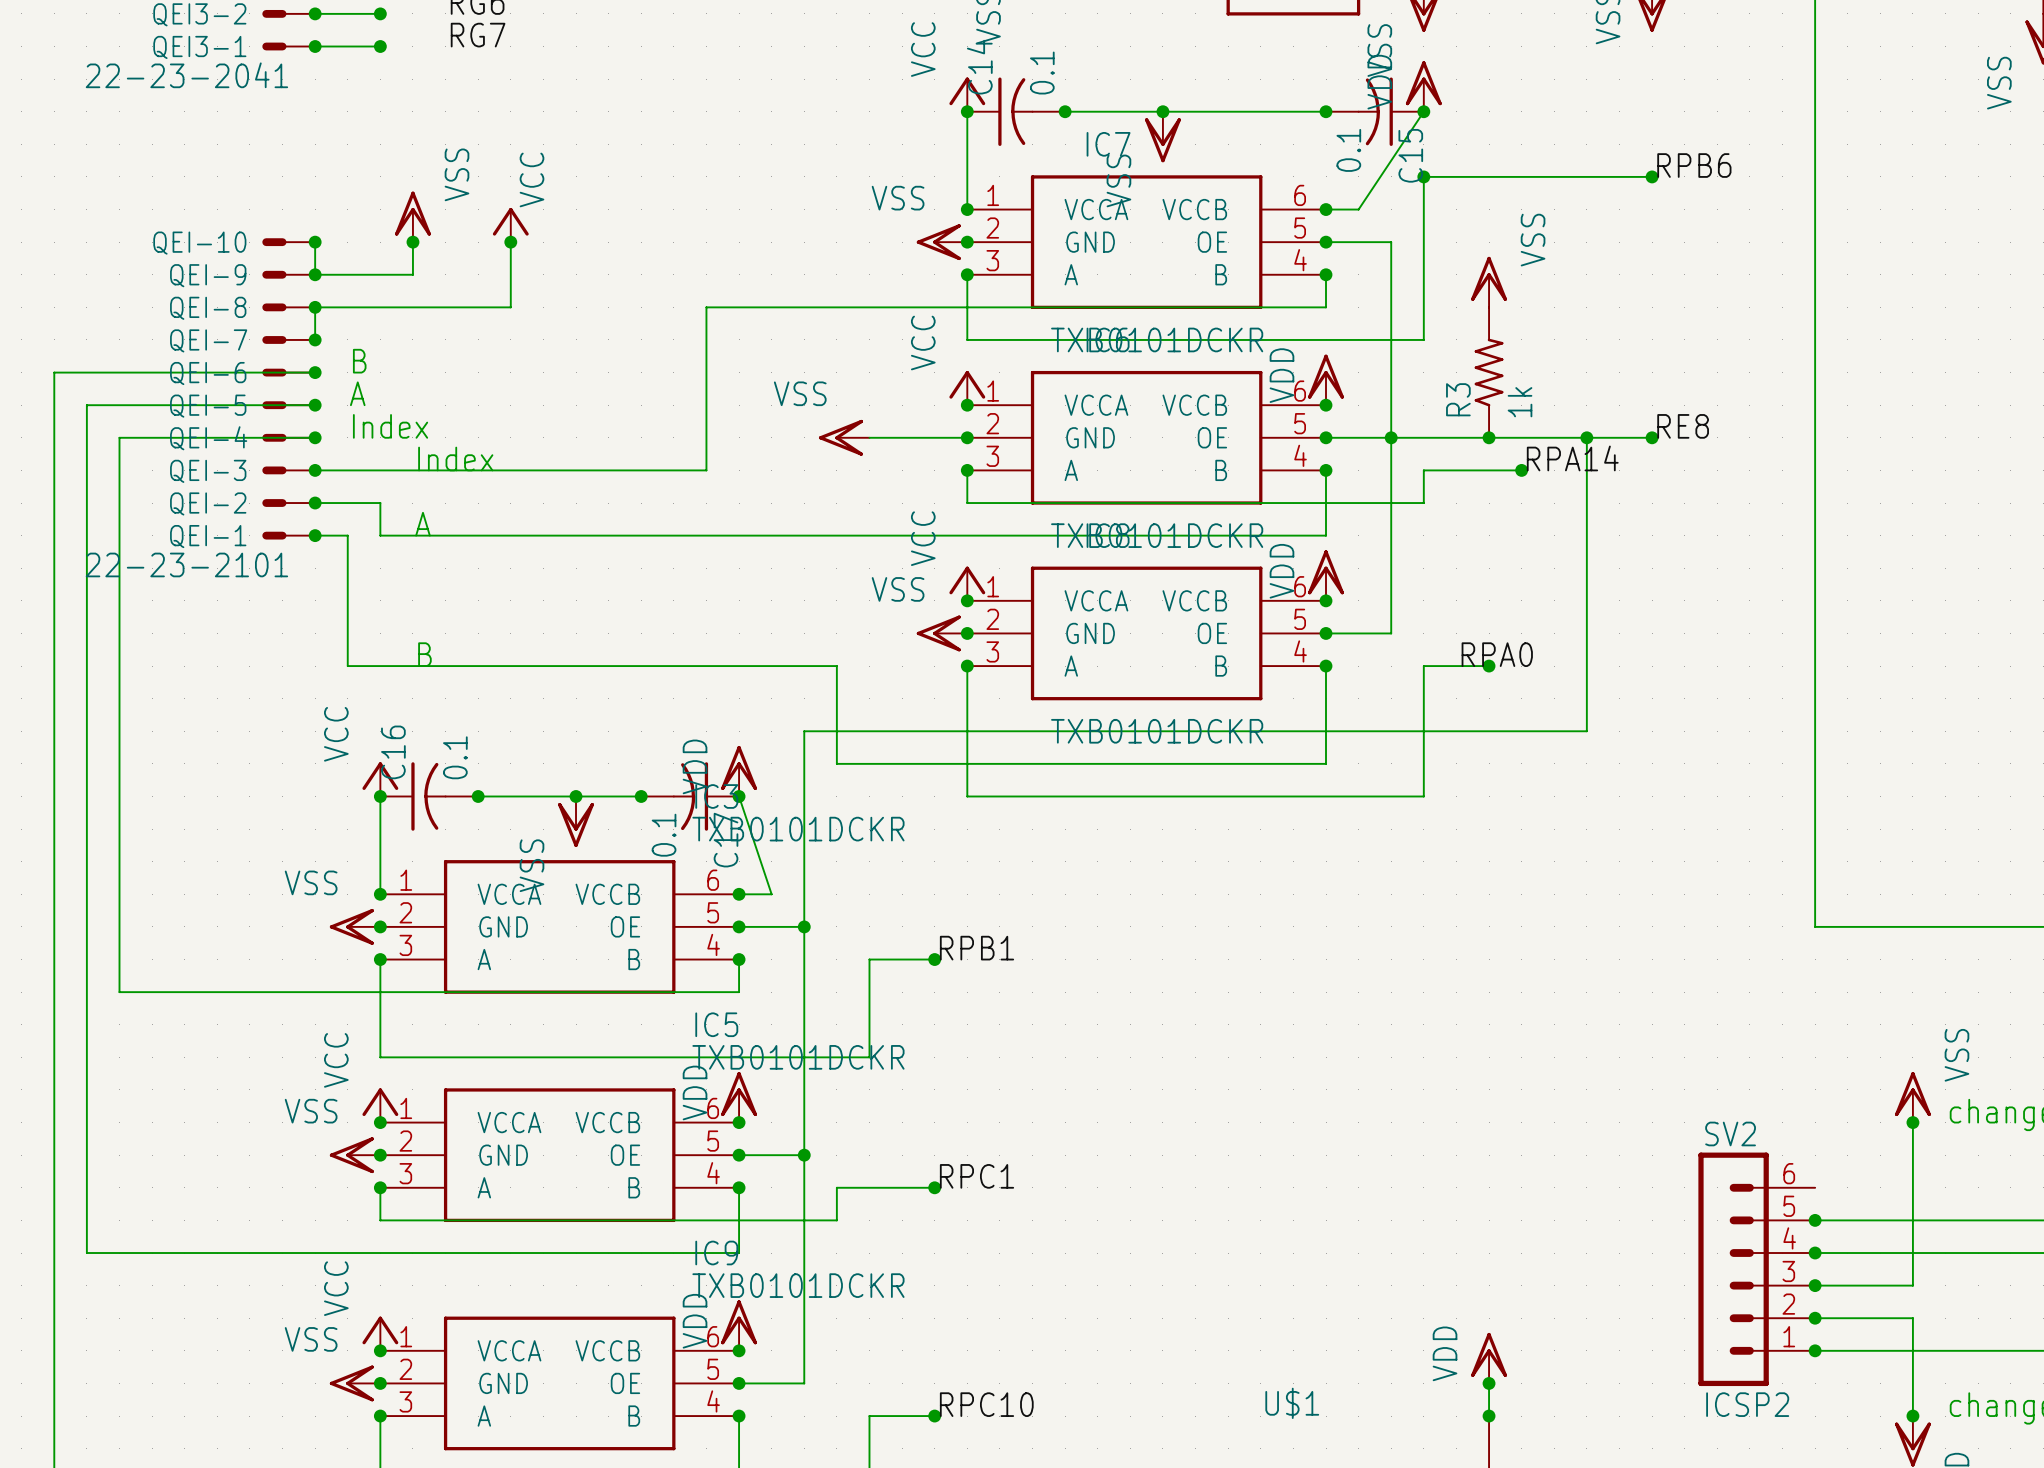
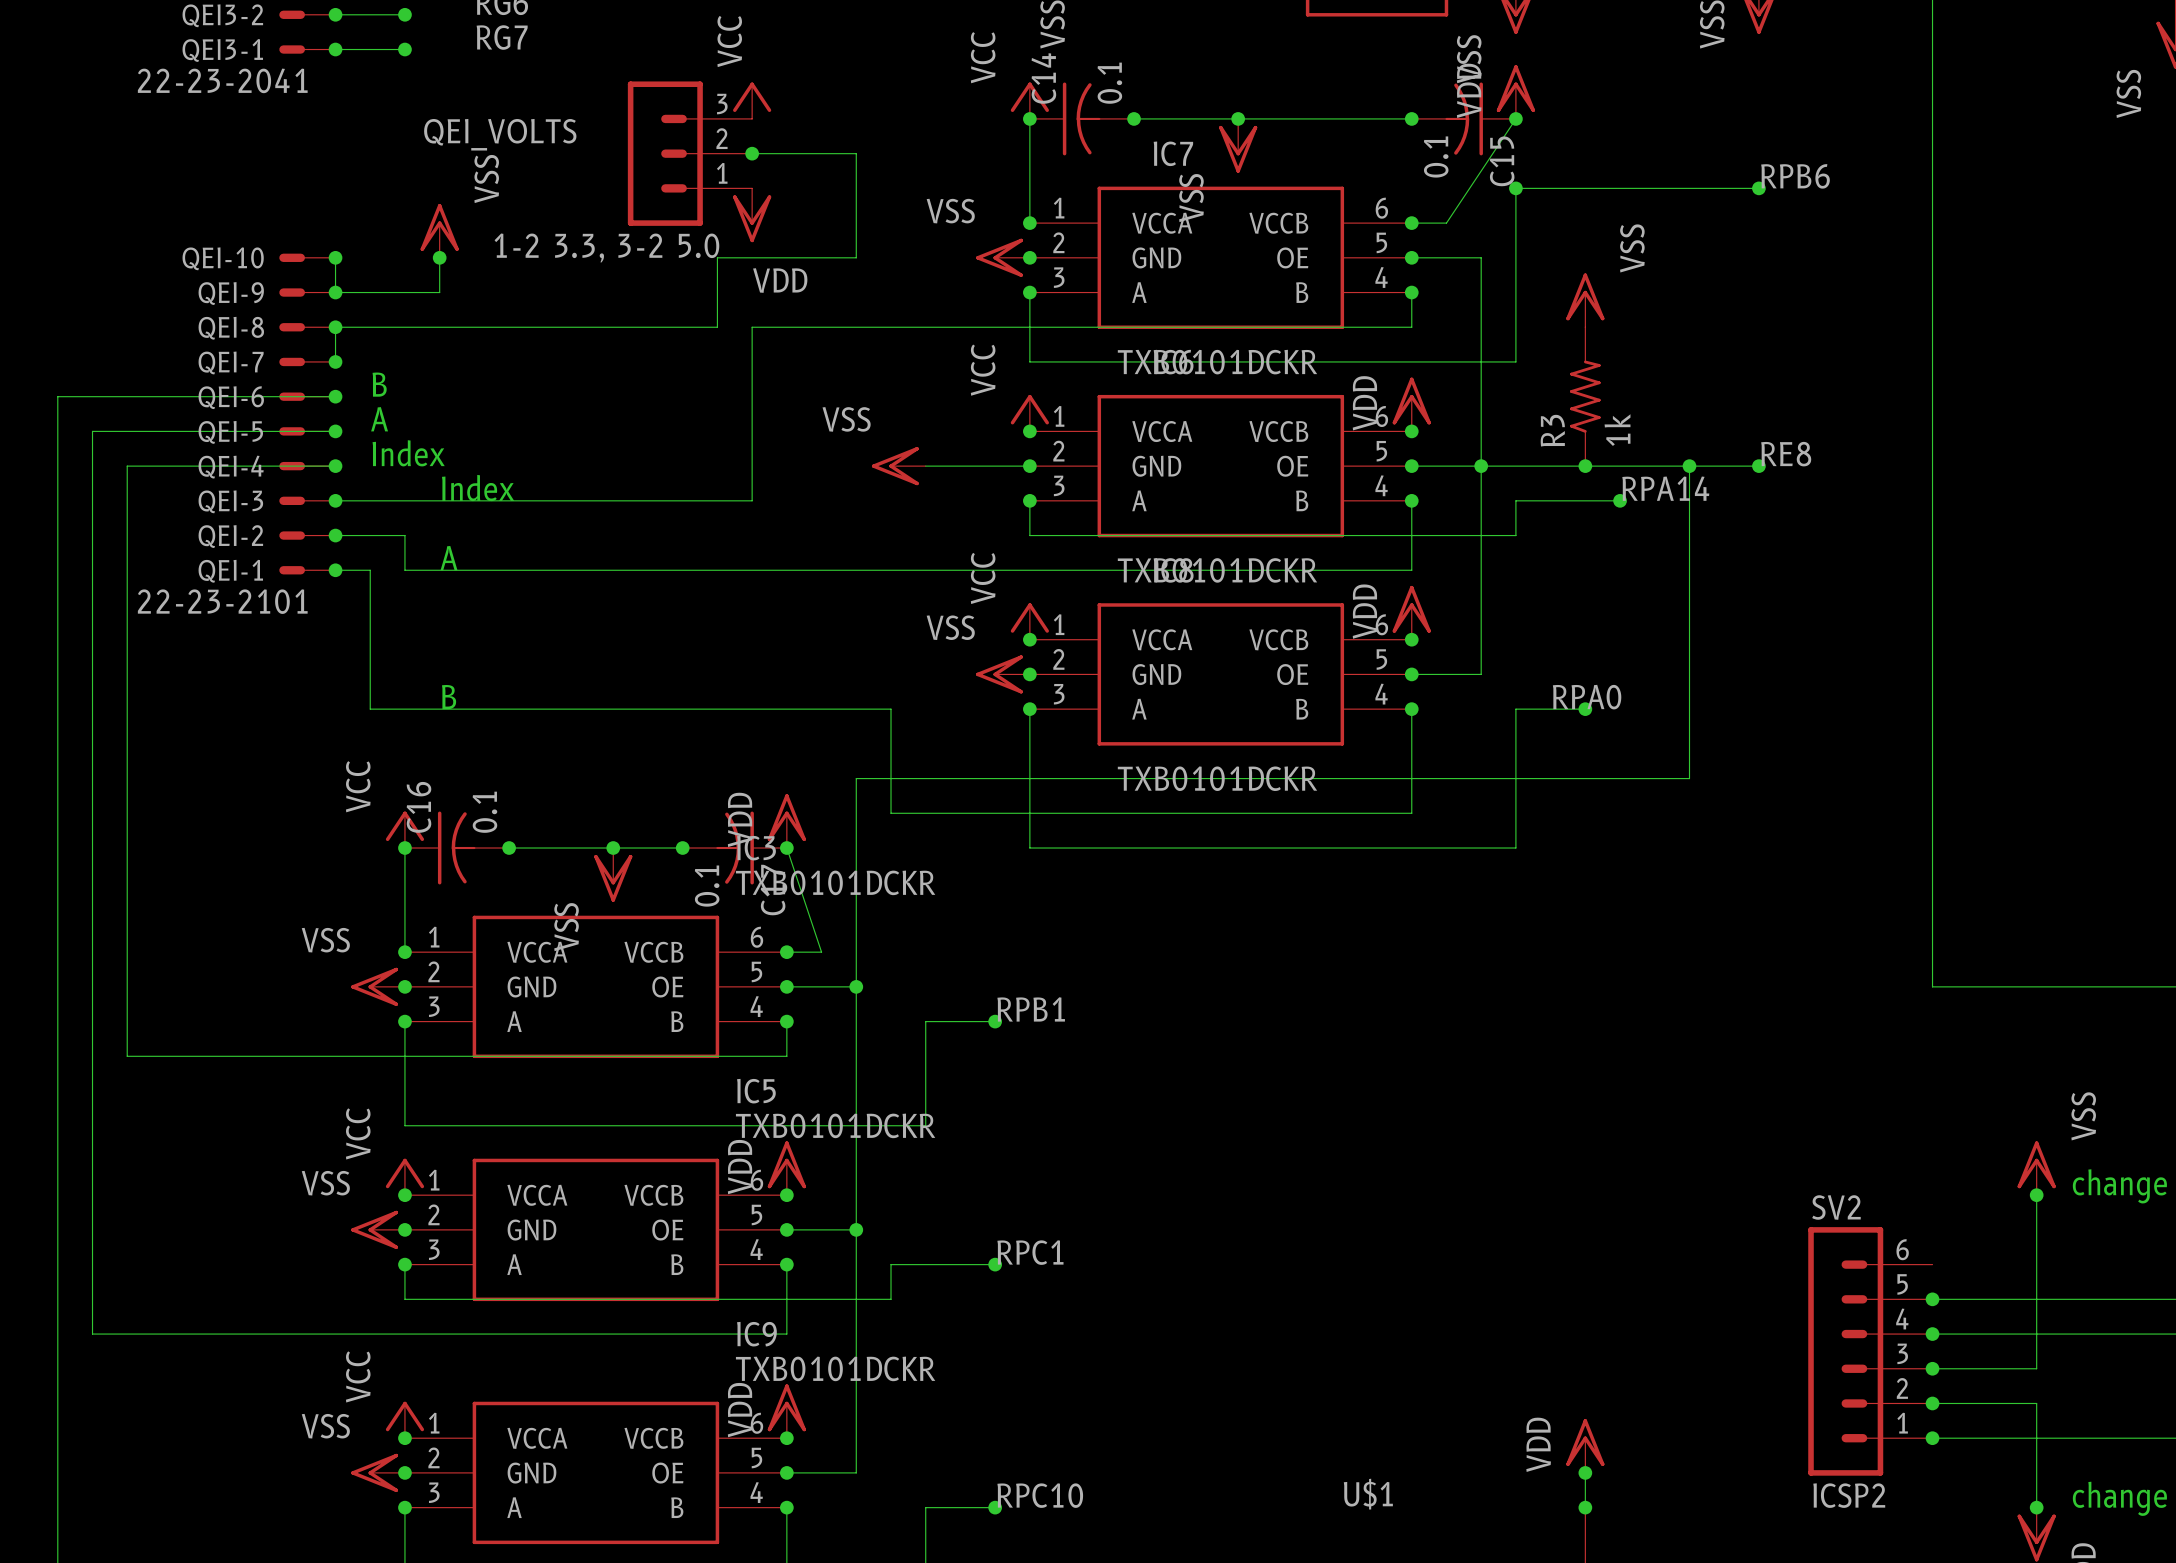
QEI_VOLTS: none -> 1-2 3.3, 3-2 5.0 (689, 153)
junction: none -> (752, 153)
power symbol text position: VCC (531, 179) -> VCC (729, 41)
power symbol: none -> VDD (752, 215)
power symbol position: VCC (510, 225) -> VCC (752, 100)
wire: (510, 242) (510, 307) -> (752, 153) (856, 153) (856, 257) (717, 257) (717, 327) (543, 327)
junction: (510, 242) -> none

